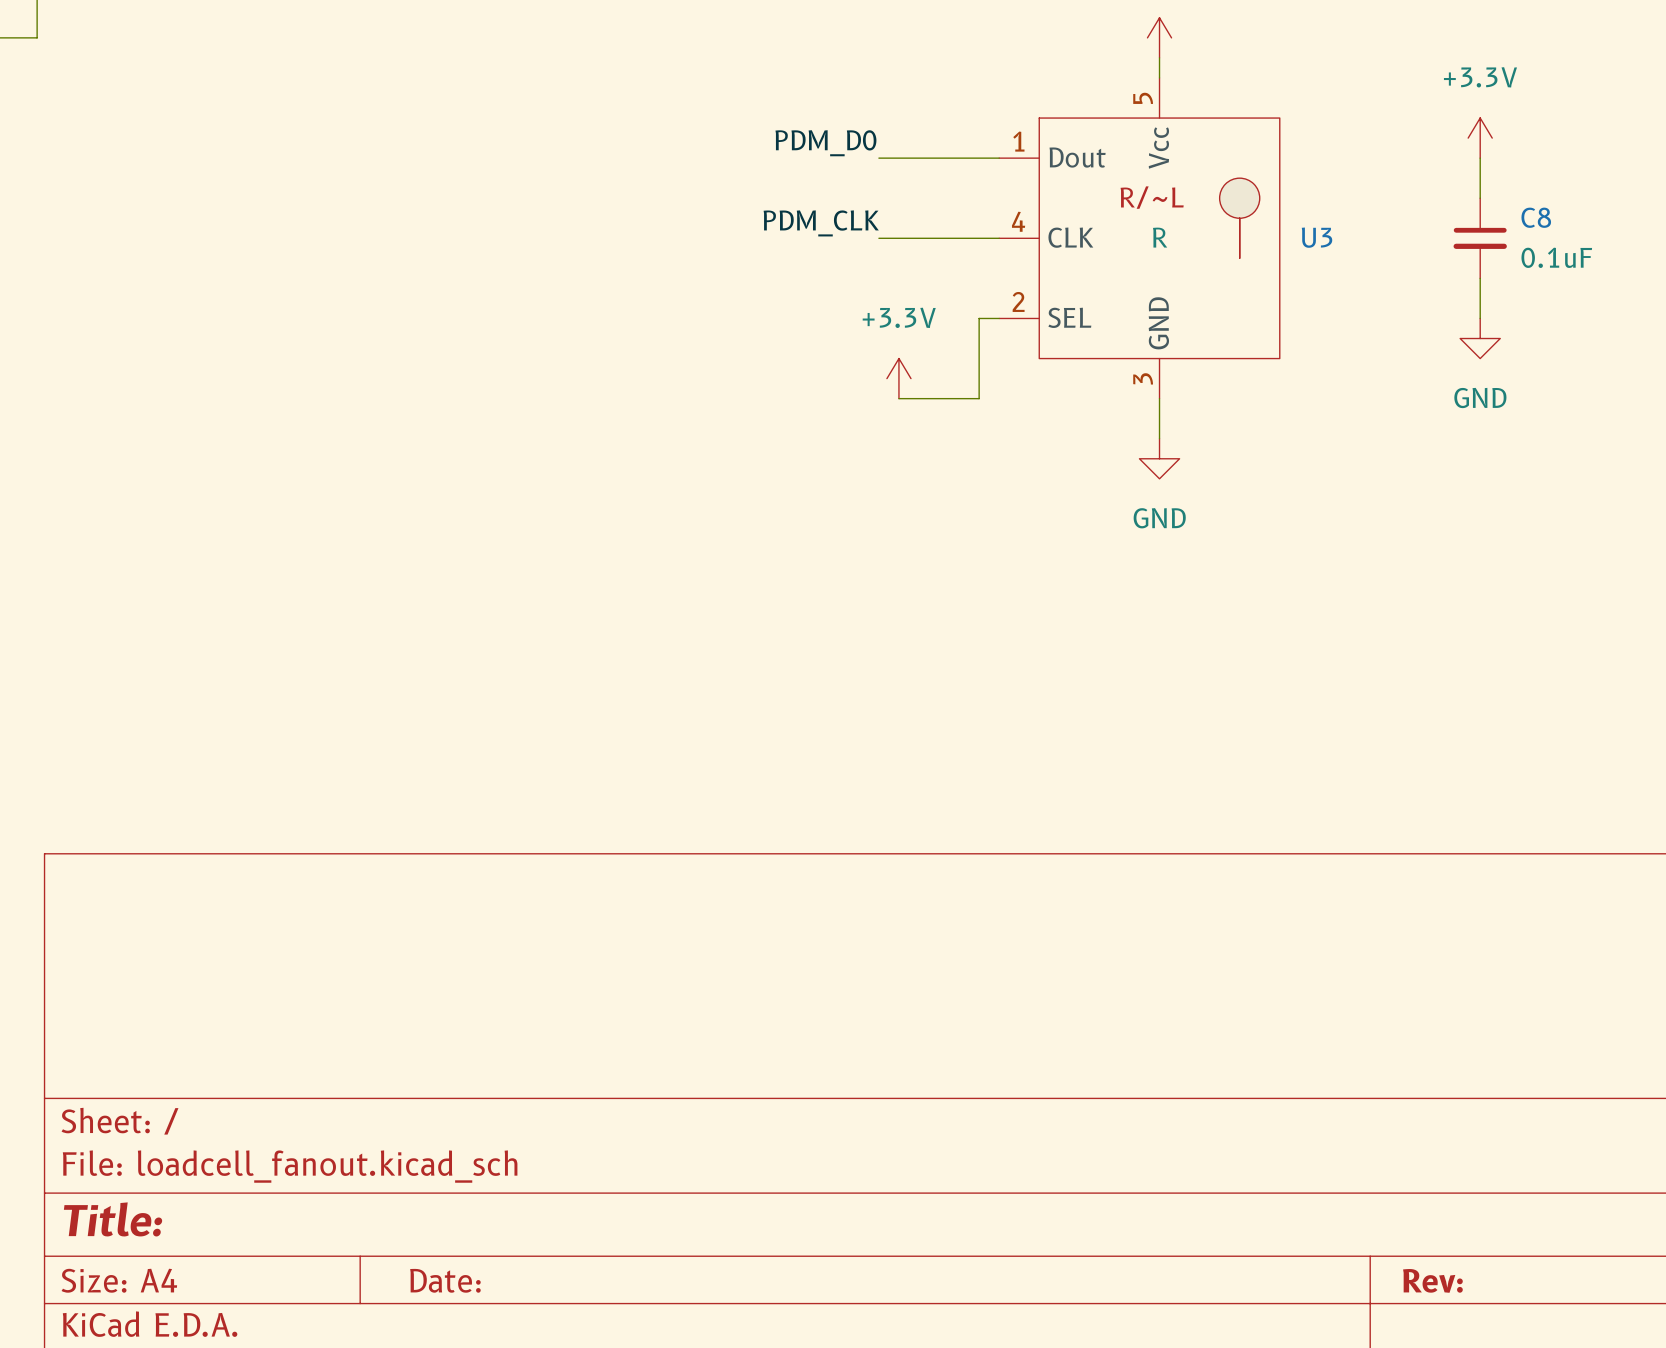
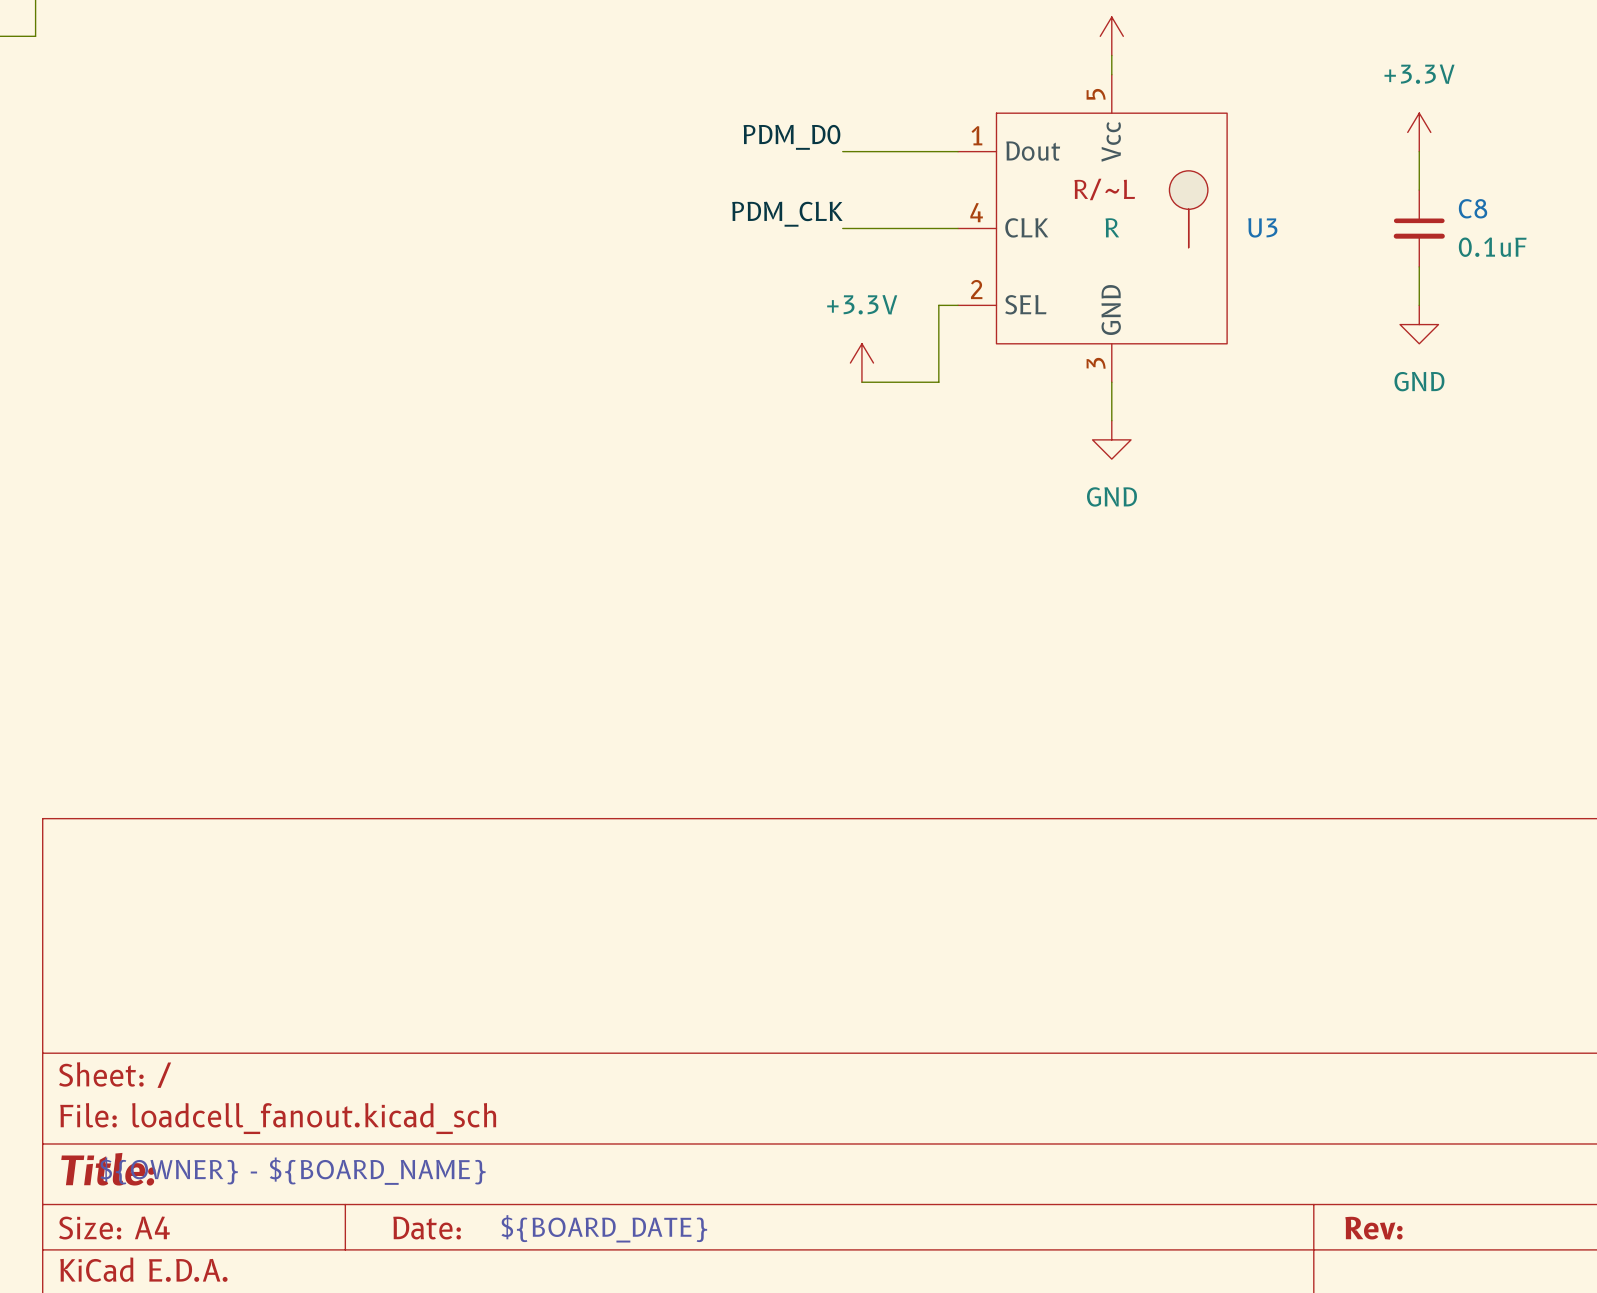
text: none -> ${OWNER} - ${BOARD_NAME} (292, 1171)
text: none -> ${BOARD_DATE} (604, 1228)

